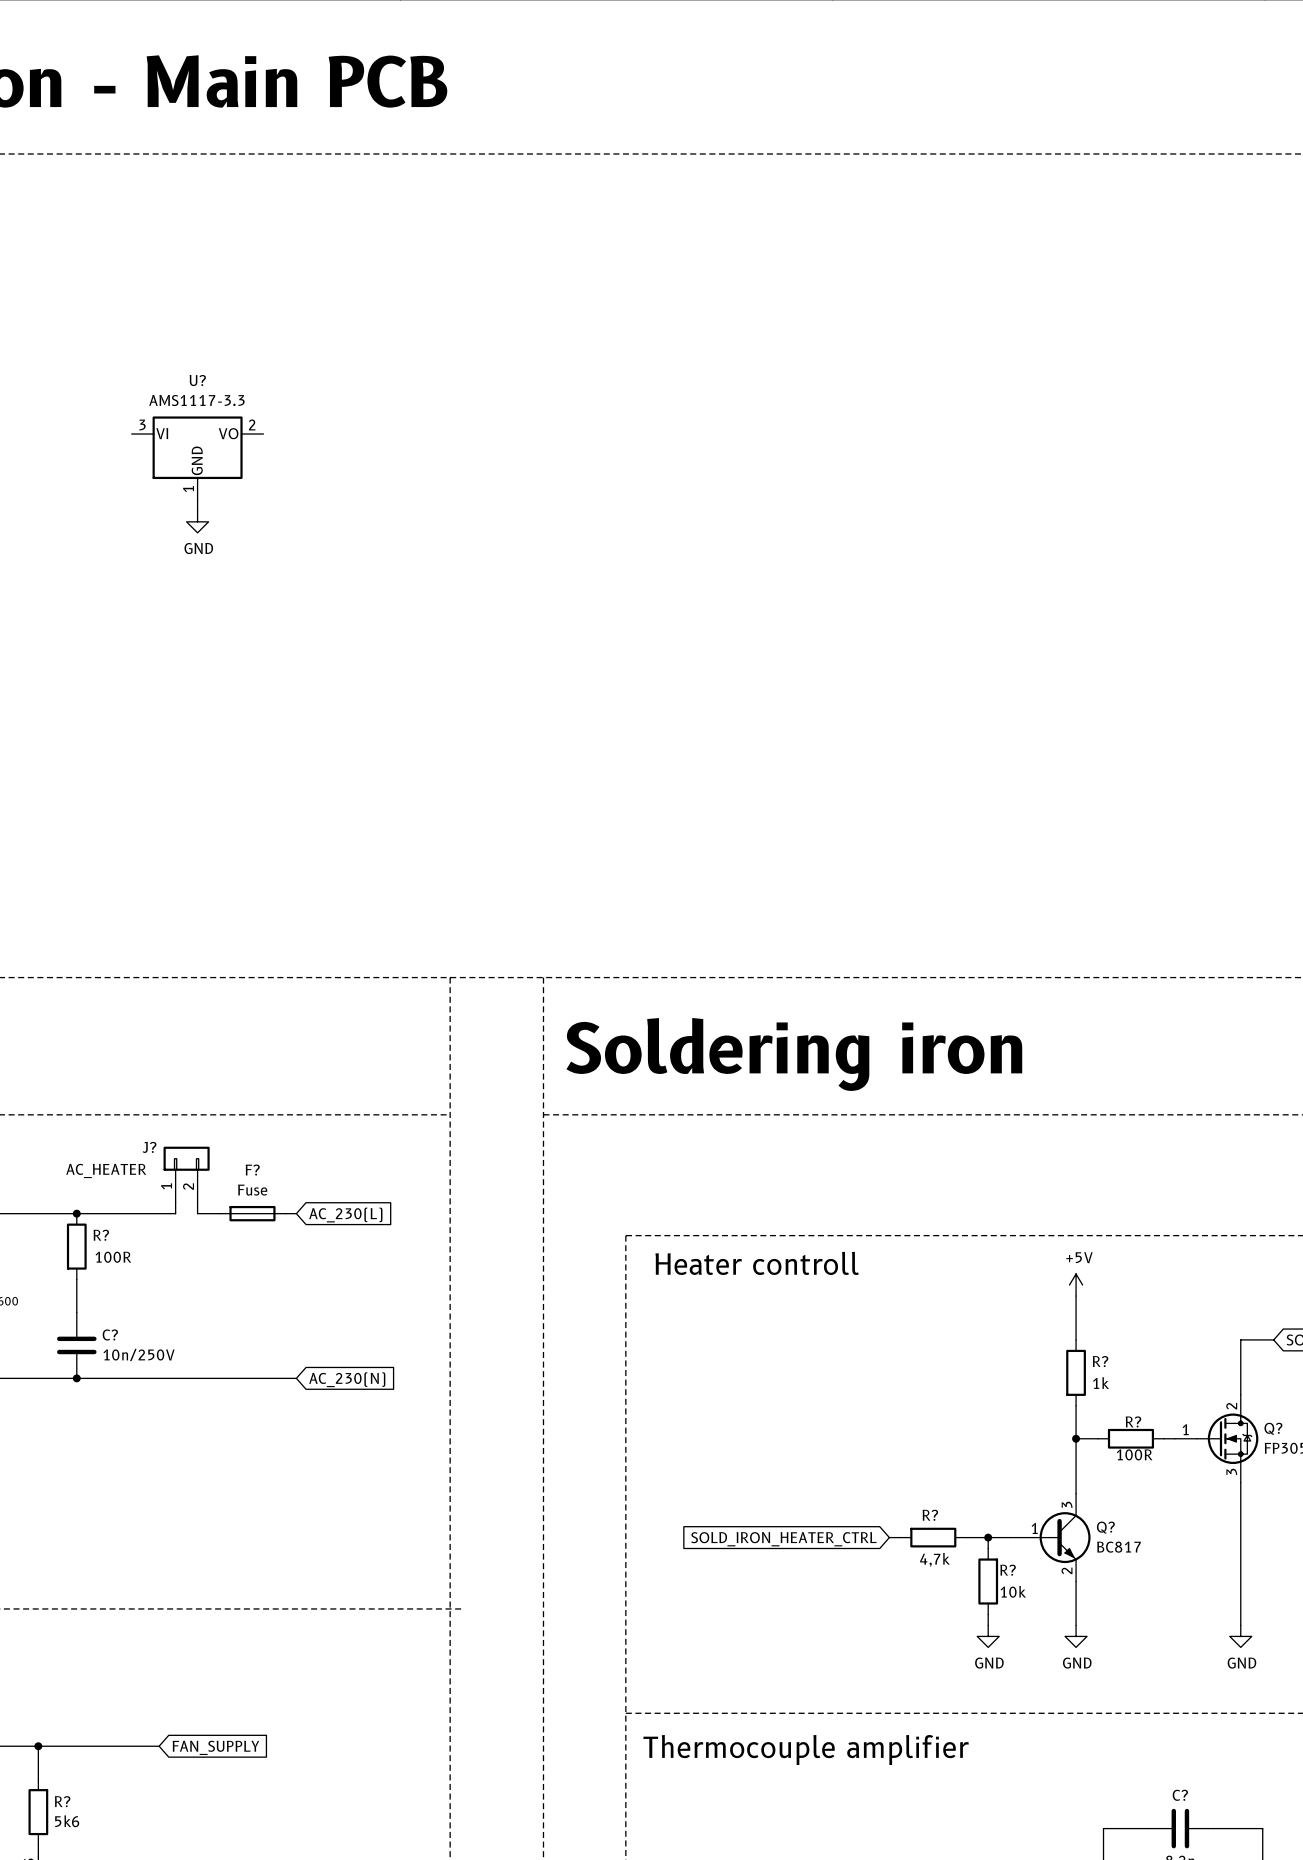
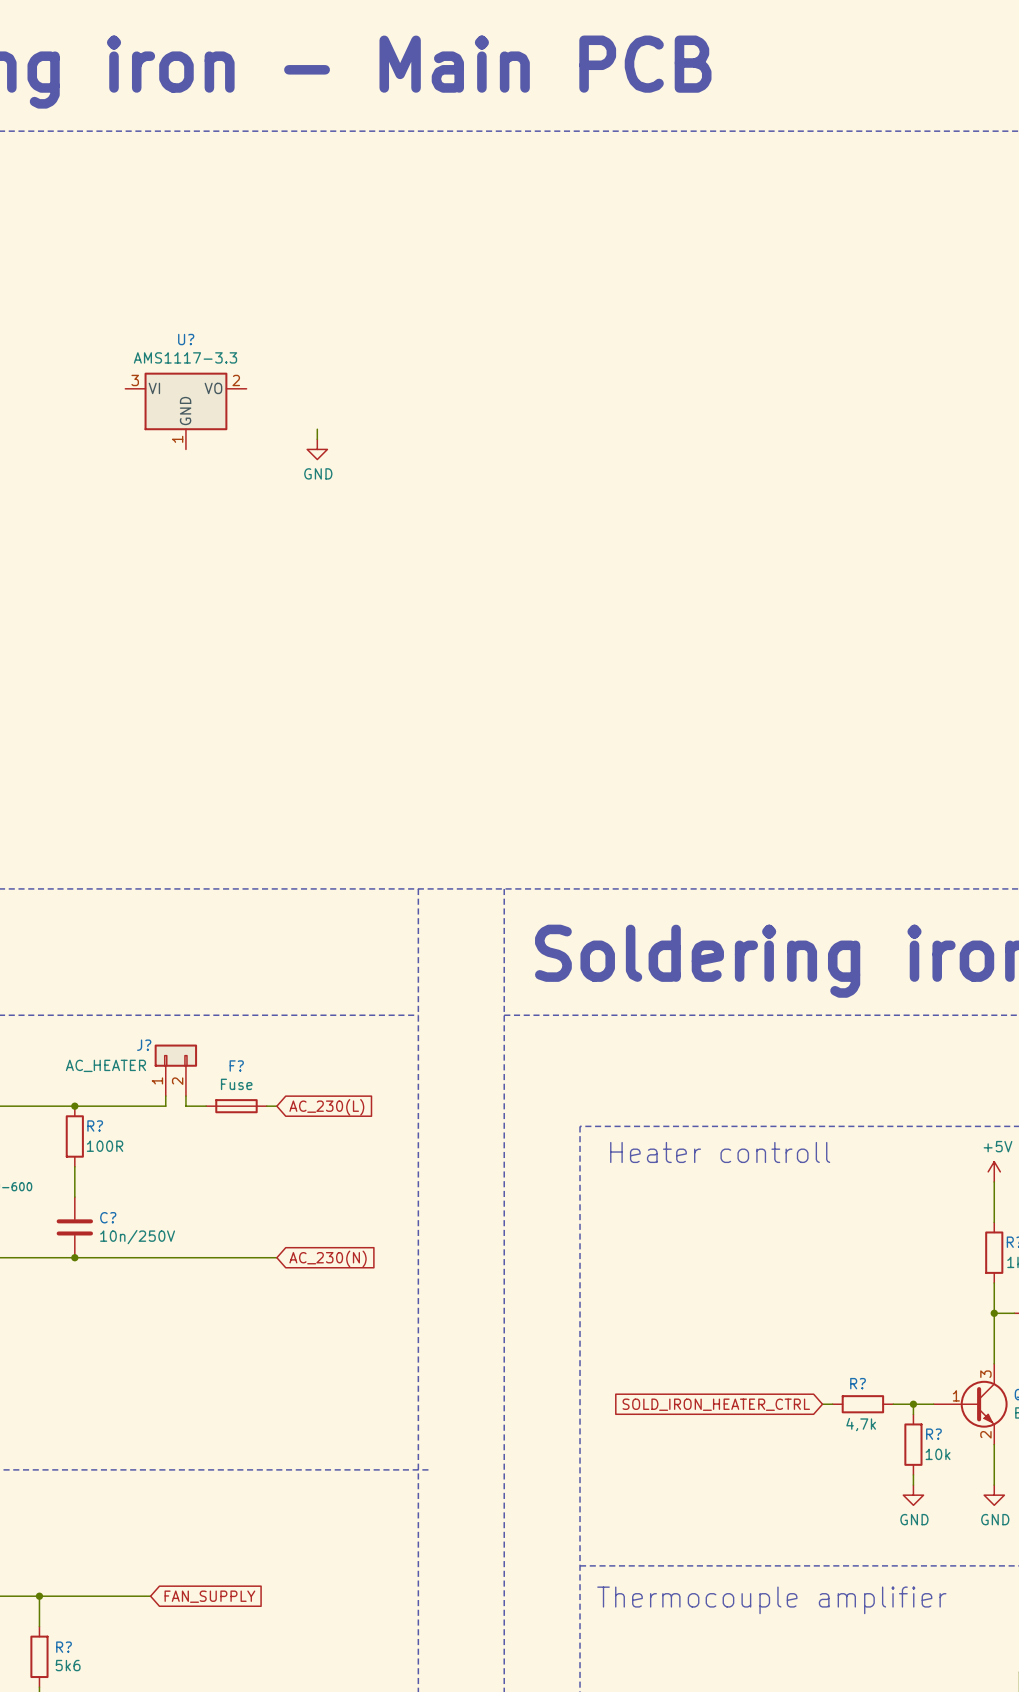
wire: (197, 499) (197, 510) -> (317, 429) (317, 439)
power symbol position: GND (197, 521) -> GND (317, 449)

